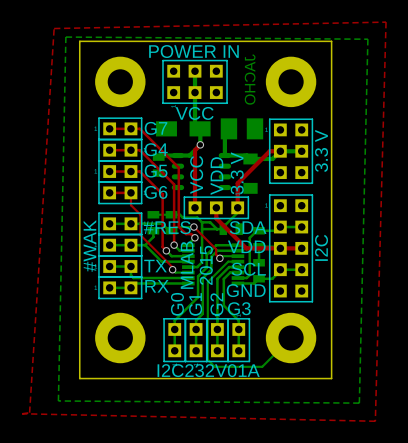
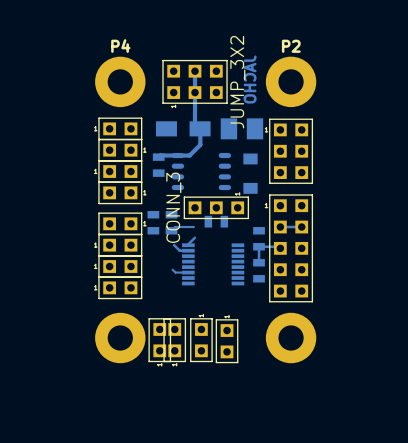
top zone outline: (386, 22) (54, 28) (29, 412) (22, 413) (375, 421) (386, 22) -> none
bottom zone outline: (65, 37) (367, 39) (359, 403) (58, 400) (65, 37) -> none
board edge: (79, 41) (79, 378) (331, 378) (331, 41) (79, 41) -> none
P4 name: none -> P4 (120, 46)
P2 name: none -> P2 (291, 46)
text: POWER IN (193, 51) -> none
part value: none -> JUMP_3X2 (237, 82)
text: VCC (194, 113) -> none
top track: (109, 128) (139, 128) (178, 167) (178, 226) (186, 234) (191, 234) (194, 237) -> none
text: G7 (156, 128) -> none
bottom track: (228, 128) (224, 132) (224, 155) (247, 155) (250, 158) (272, 158) (280, 151) (301, 151) -> none
top track: (200, 144) (195, 150) (195, 207) -> none
via: (200, 144) -> none
text: G4 (156, 149) -> none
top track: (109, 150) (139, 150) (174, 184) (174, 245) -> none
text: 3.3 V (321, 150) -> none
top track: (280, 151) (269, 151) (237, 183) (237, 207) -> none
top track: (109, 171) (139, 171) (162, 194) (162, 247) (166, 250) -> none
text: G5 (156, 171) -> none
text: 3.3 V (237, 173) -> none
text: VCC (196, 174) -> none
text: VDD (216, 176) -> none
top track: (109, 192) (130, 192) (130, 205) (140, 214) (140, 235) (172, 267) (172, 269) -> none
text: G6 (156, 192) -> none
part value: none -> CONN_3 (173, 207)
top track: (216, 207) (216, 218) (246, 248) (301, 248) -> none
bottom track: (237, 207) (237, 212) (223, 227) (223, 231) -> none
bottom track: (153, 214) (179, 214) (182, 217) (197, 217) (202, 222) -> none
bottom track: (202, 222) (210, 222) (217, 229) (223, 229) -> none
bottom track: (202, 222) (202, 262) (197, 267) (188, 267) -> none
bottom track: (109, 223) (161, 223) (169, 230) (174, 228) -> none
text: #RES (167, 227) -> none
top track: (193, 227) (216, 249) (216, 254) (219, 258) -> none
via: (193, 227) -> none
text: SDA (248, 227) -> none
bottom track: (280, 227) (276, 230) (256, 230) (249, 237) (249, 275) (246, 278) (237, 278) -> none
bottom track: (202, 229) (216, 229) -> none
part position: (231, 229) -> (216, 221)
bottom track: (153, 230) (153, 237) (145, 245) -> none
via: (194, 237) -> none
text: #WAK (89, 245) -> none
bottom track: (109, 245) (145, 245) -> none
bottom track: (145, 245) (161, 261) (188, 261) -> none
via: (174, 245) -> none
bottom track: (237, 245) (216, 245) (206, 254) (206, 267) (198, 276) (198, 297) (174, 320) (174, 350) -> none
text: VDD (246, 246) -> none
text: I2C (321, 247) -> none
bottom track: (166, 250) (171, 256) (188, 256) -> none
via: (166, 250) -> none
bottom track: (237, 250) (217, 250) (211, 256) (211, 269) (202, 278) (202, 313) (196, 320) (196, 350) -> none
bottom track: (237, 256) (222, 256) (219, 258) -> none
via: (219, 258) -> none
bottom track: (237, 261) (228, 261) (207, 282) (207, 359) (214, 366) (262, 366) (291, 338) -> none
text: MLAB (187, 265) -> none
text: 2015 (206, 265) -> none
bottom track: (109, 266) (130, 266) (130, 275) (133, 278) (188, 278) -> none
text: TX (155, 266) -> none
bottom track: (237, 267) (229, 267) (217, 278) (217, 350) -> none
via: (172, 269) -> none
text: SCL (248, 269) -> none
bottom track: (301, 269) (280, 269) (272, 278) (259, 278) (254, 283) (237, 283) -> none
bottom track: (237, 272) (230, 272) (223, 278) (223, 305) (238, 320) (238, 350) -> none
bottom track: (188, 283) (135, 283) (130, 287) (109, 287) -> none
text: RX (157, 286) -> none
text: GND (246, 290) -> none
text: G0 (177, 304) -> none
text: G1 (195, 304) -> none
text: G2 (216, 304) -> none
text: G3 (239, 308) -> none
part: none -> (159, 340)
part rotation: 0° (196, 340) -> 180° (201, 340)
part: (217, 340) -> none
part: (238, 340) -> none
part: none -> (227, 341)
text: I2C232V01A (208, 370) -> none

